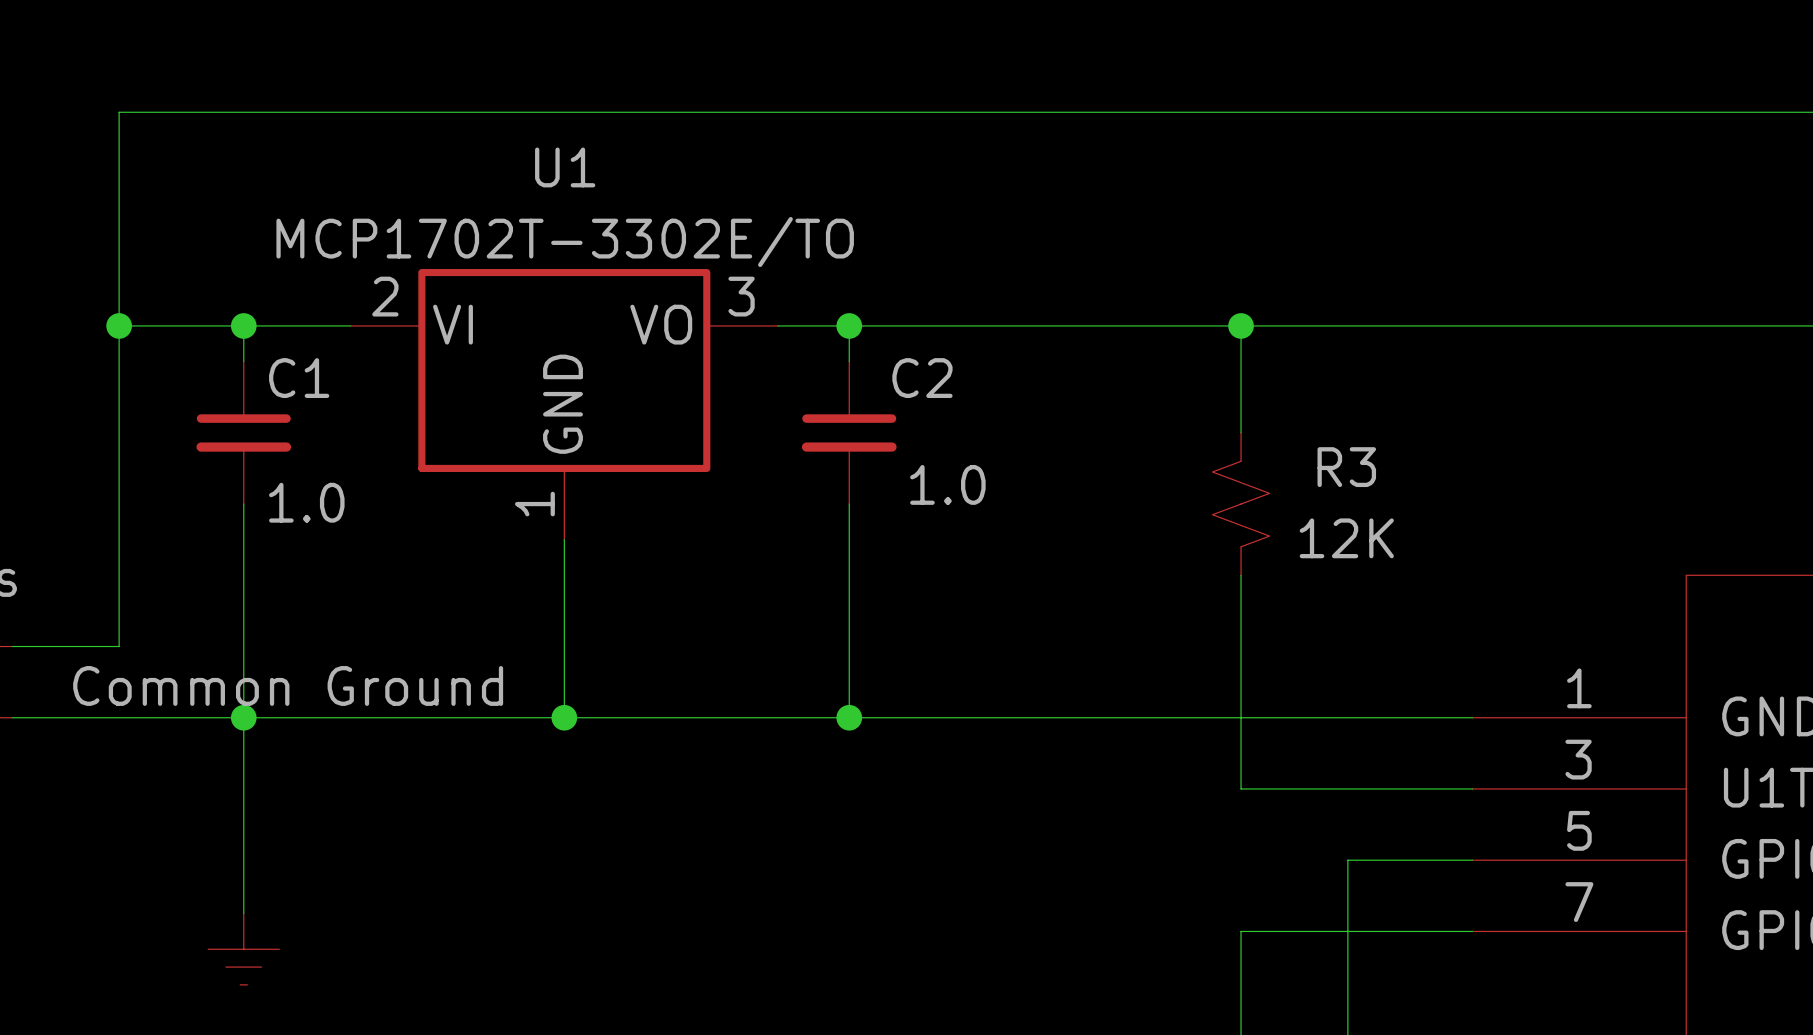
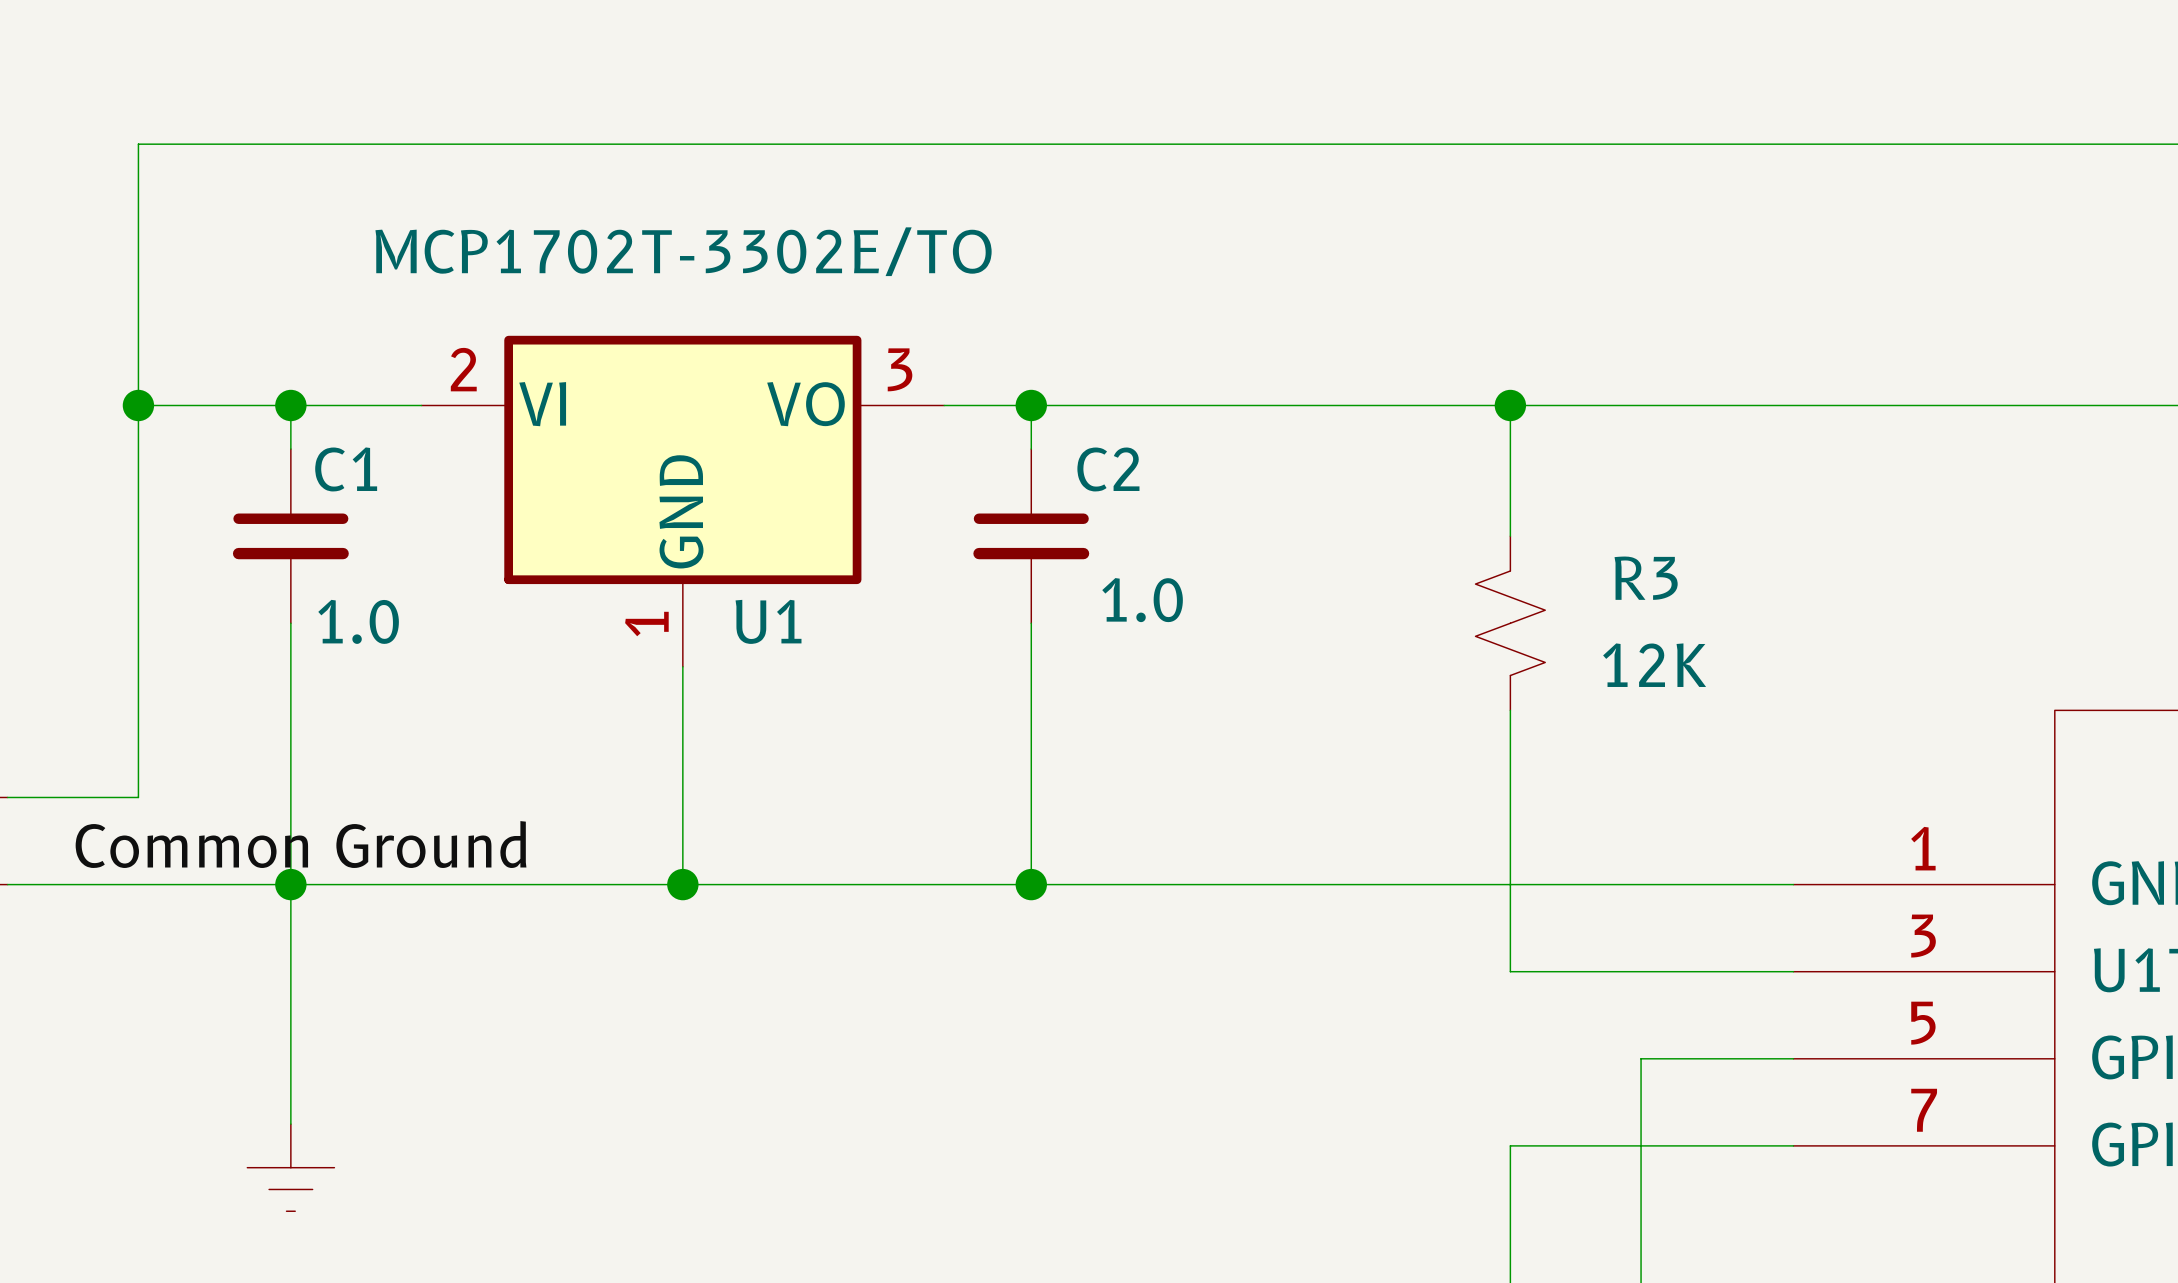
U1 name position: U1 (565, 167) -> U1 (768, 621)
U1 value position: MCP1702T-3302E/TO (565, 241) -> MCP1702T-3302E/TO (683, 251)

